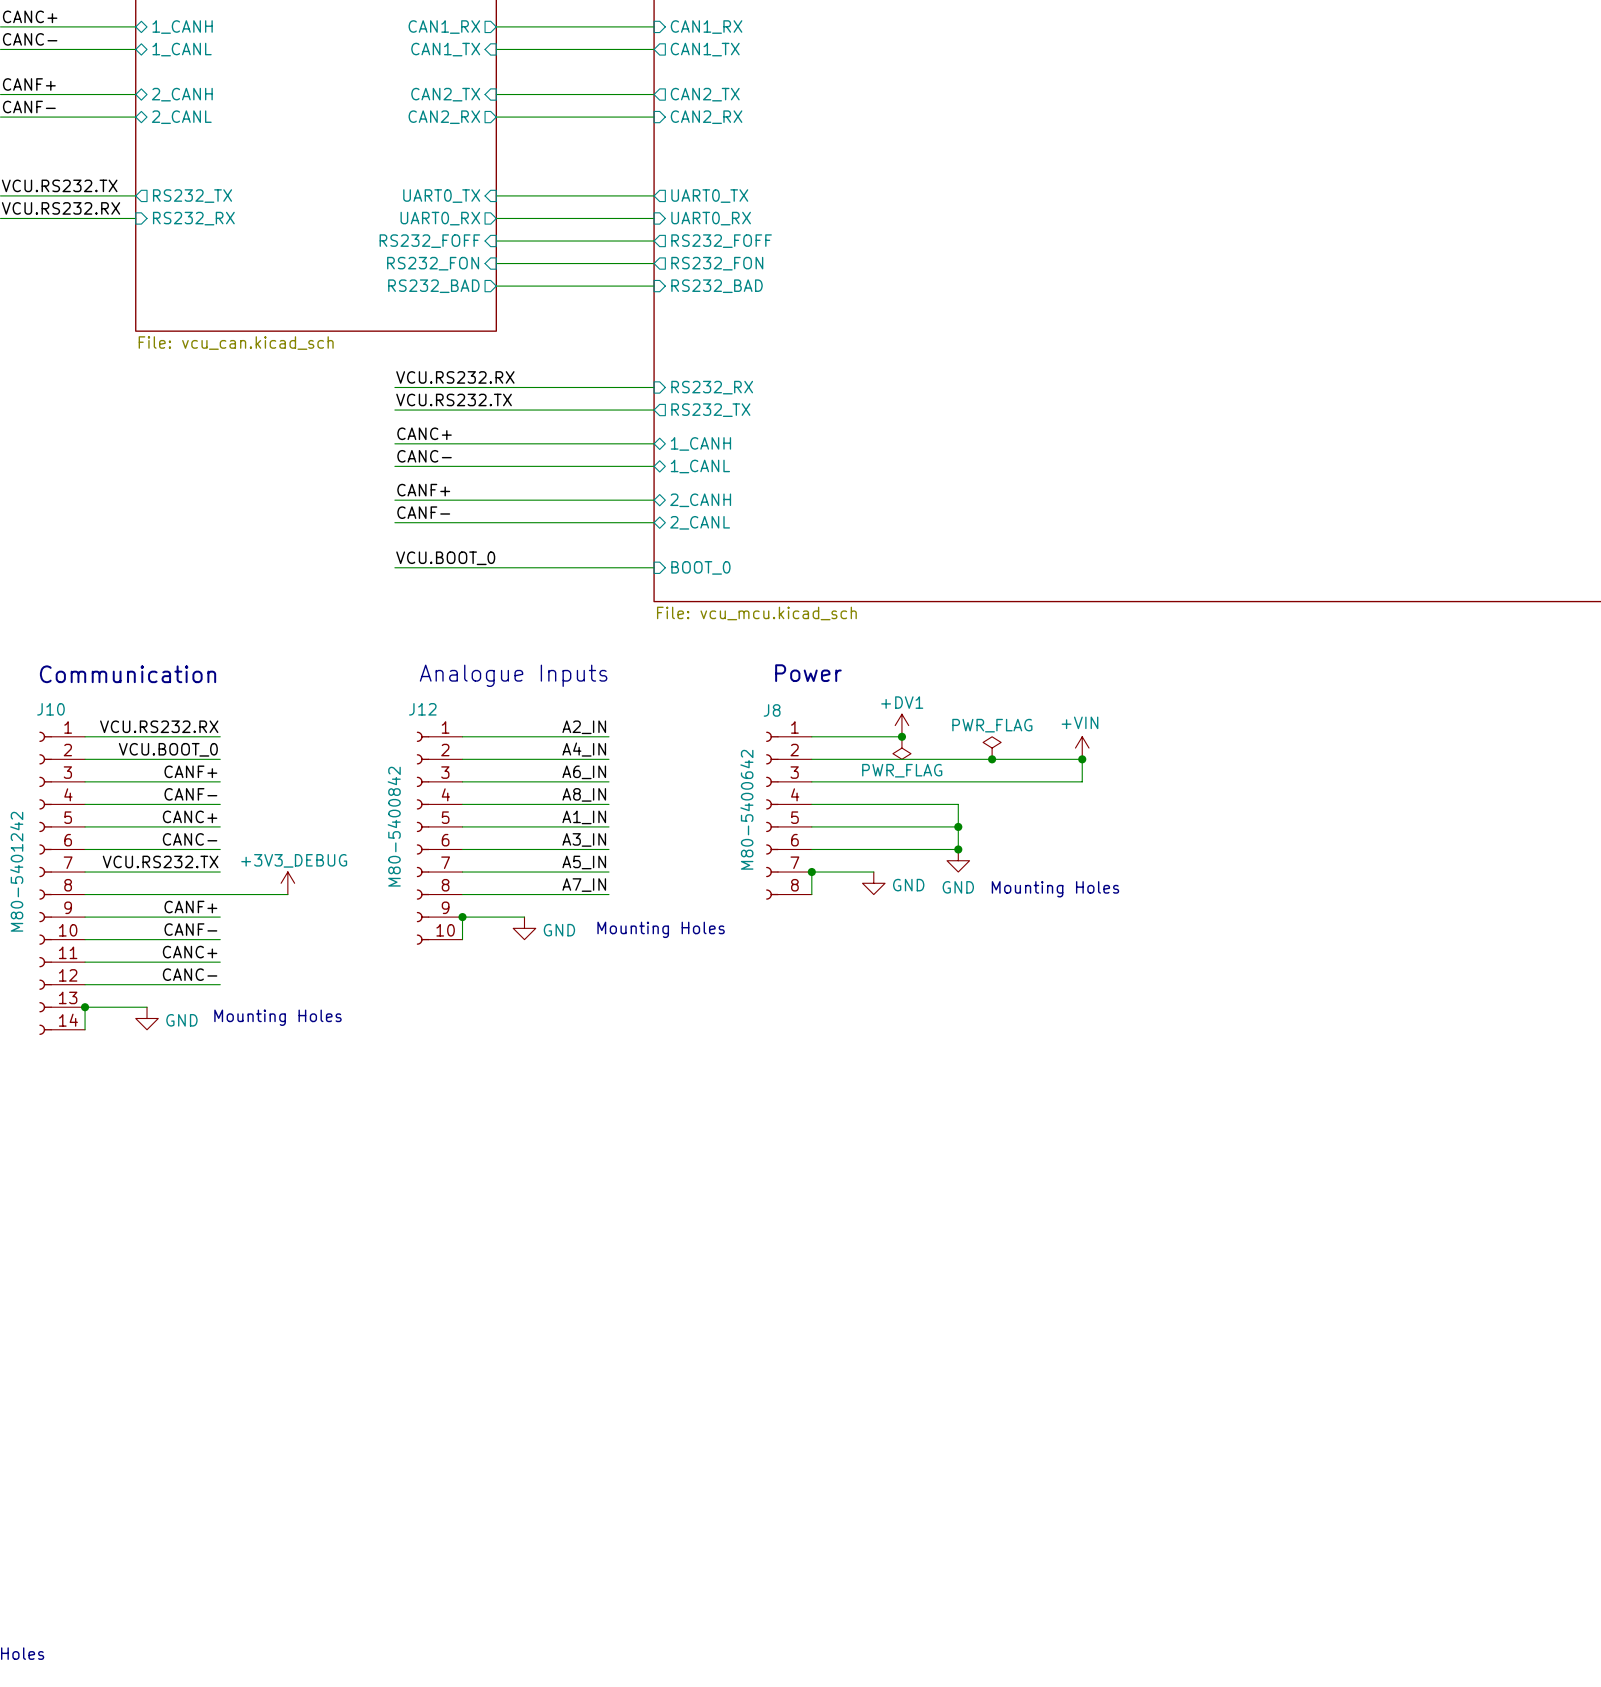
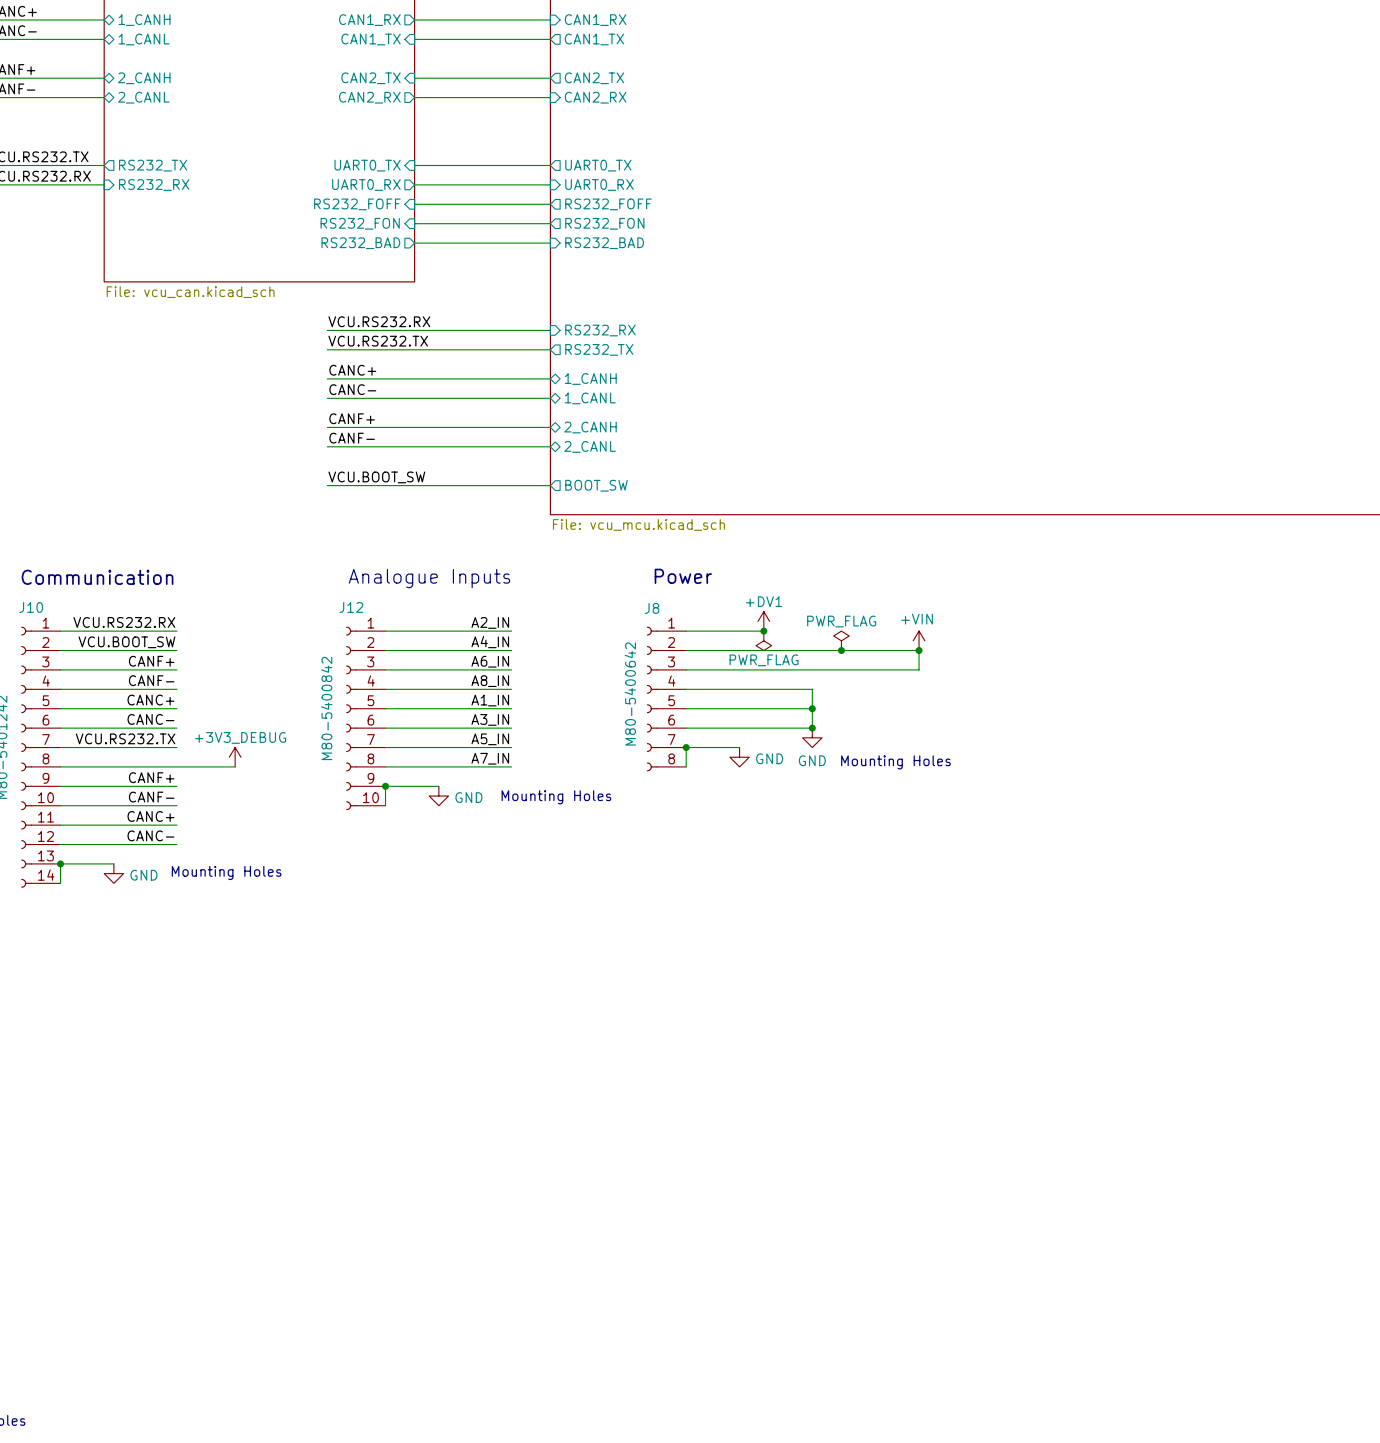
label: VCU.BOOT_0 (445, 558) -> VCU.BOOT_SW (376, 477)
sheet pin shape: input (700, 567) -> output (596, 485)
sheet pin: BOOT_0 (700, 567) -> BOOT_SW (596, 485)
label: VCU.BOOT_0 (168, 749) -> VCU.BOOT_SW (126, 642)

